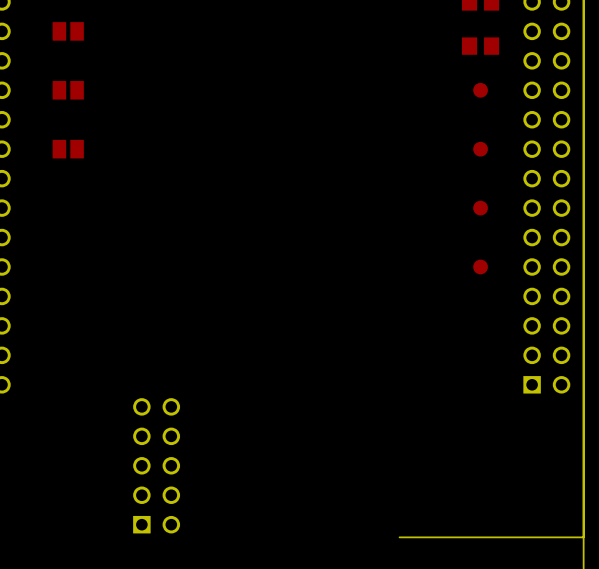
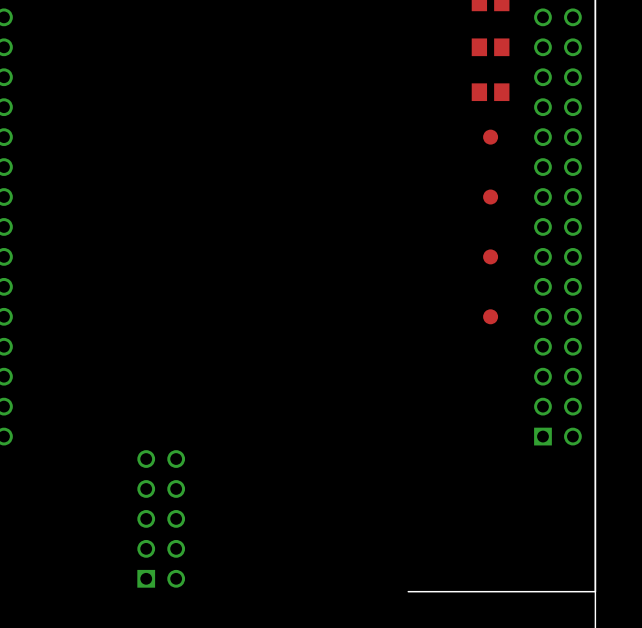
part: (68, 31) -> none
part: (68, 90) -> none
part: (68, 149) -> none

